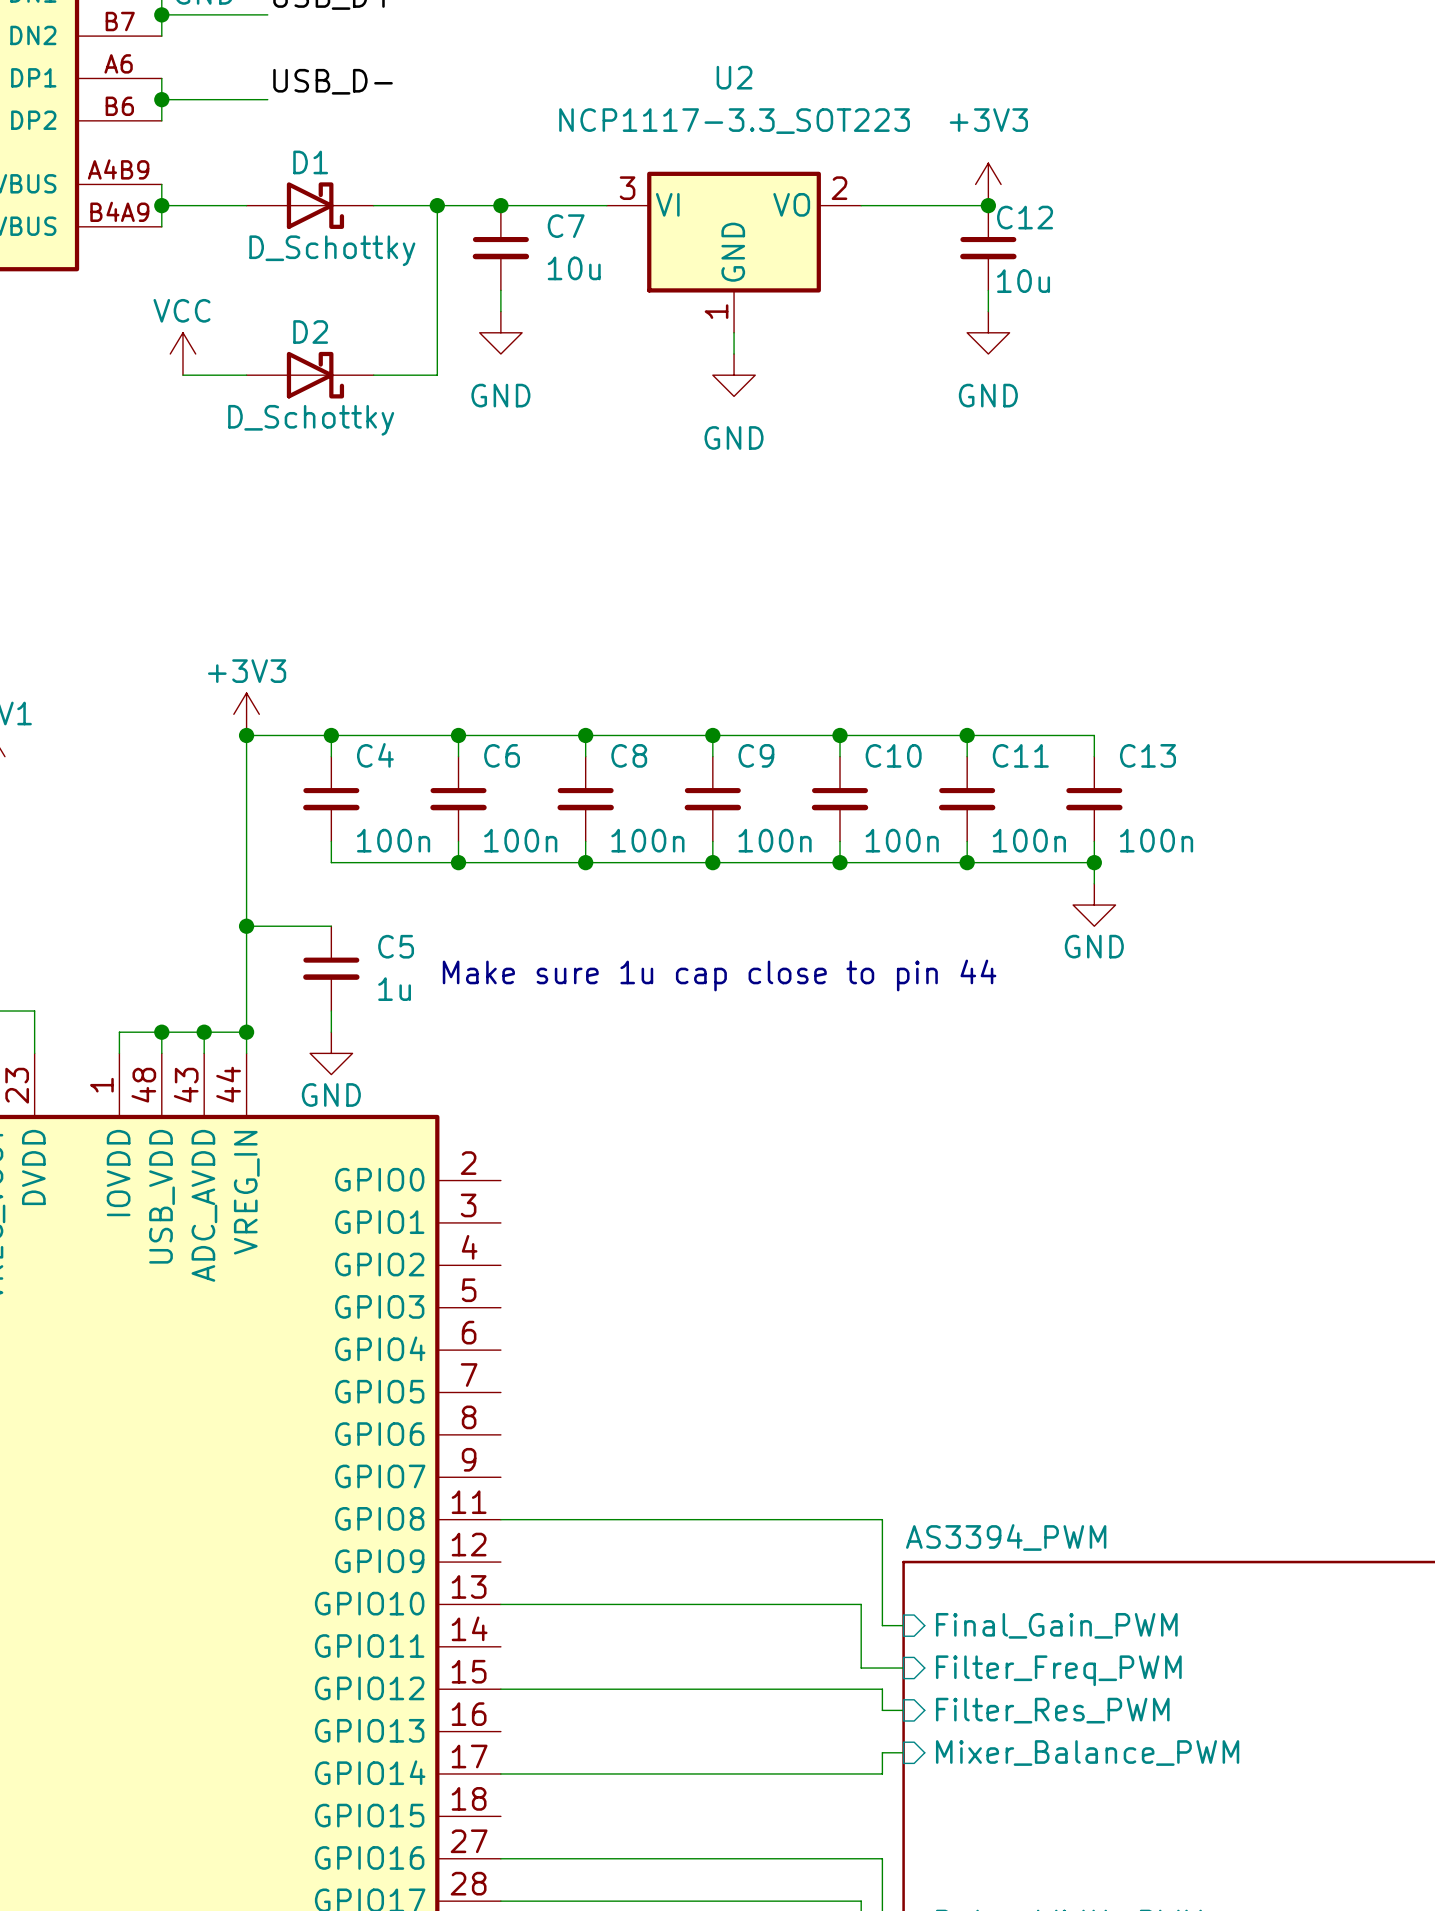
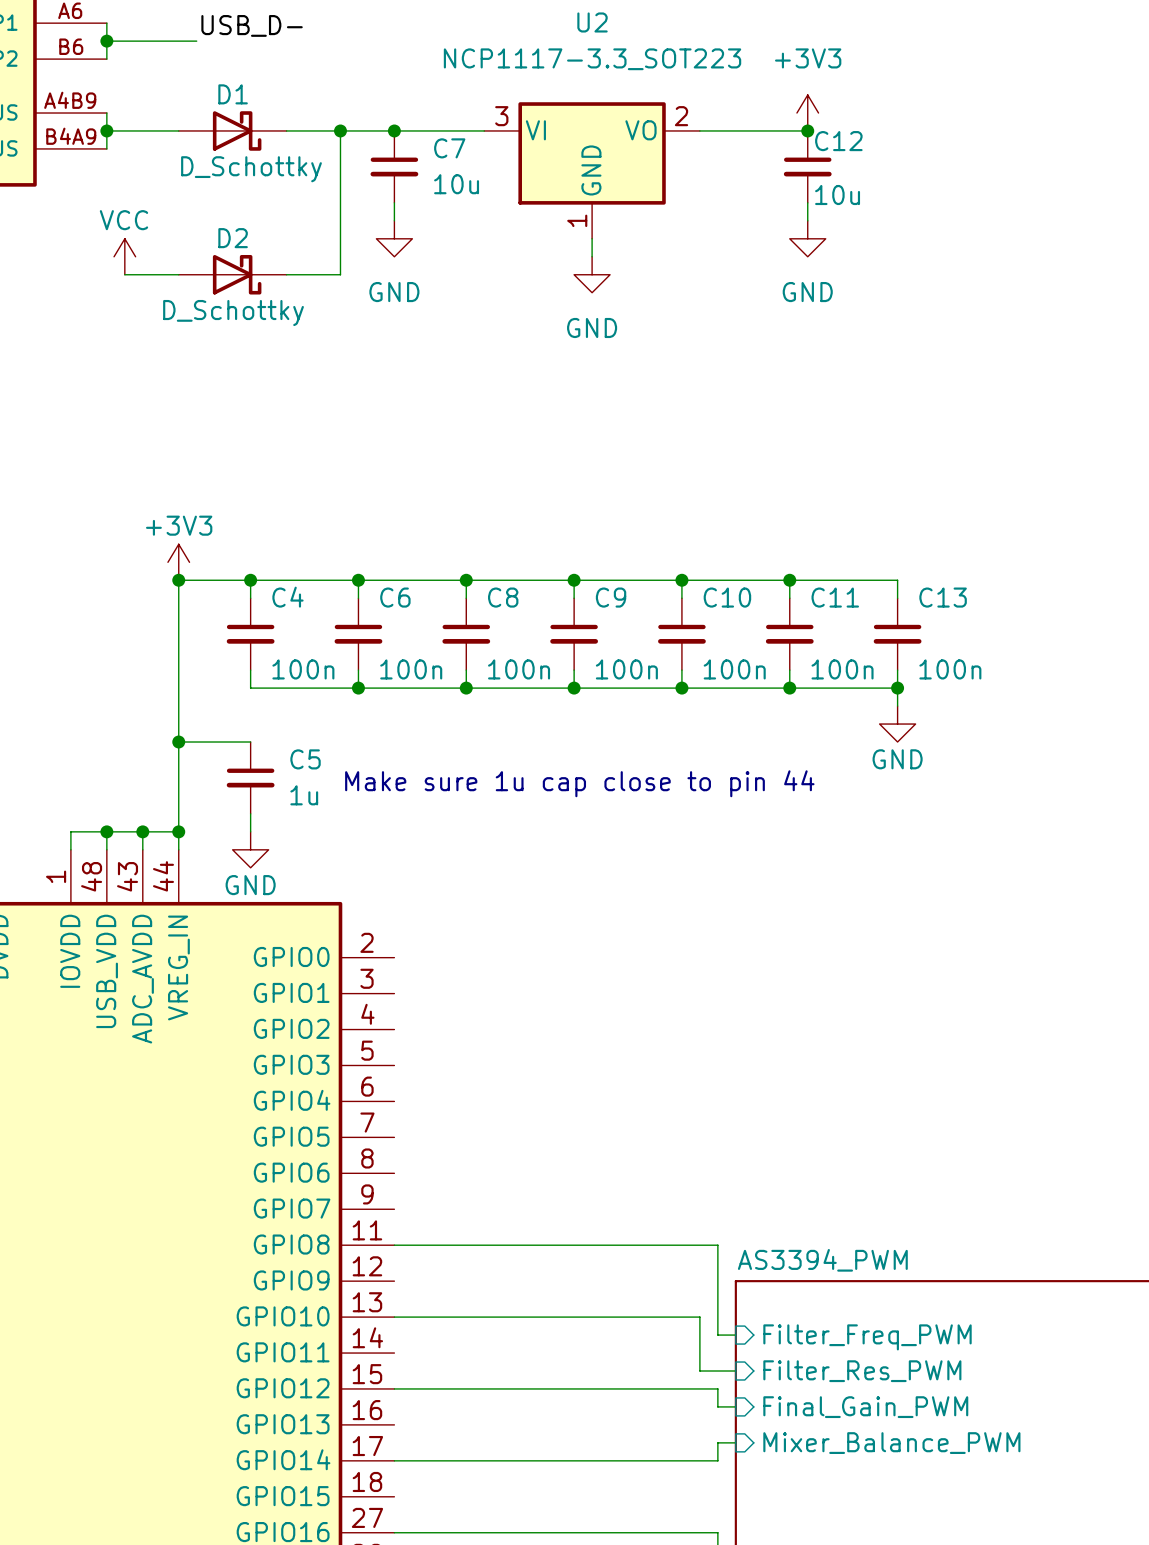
sheet pin: Final_Gain_PWM (1056, 1625) -> Filter_Freq_PWM (867, 1337)
sheet pin: Filter_Freq_PWM (1058, 1670) -> Filter_Res_PWM (862, 1371)
sheet pin: Filter_Res_PWM (1052, 1710) -> Final_Gain_PWM (865, 1407)

